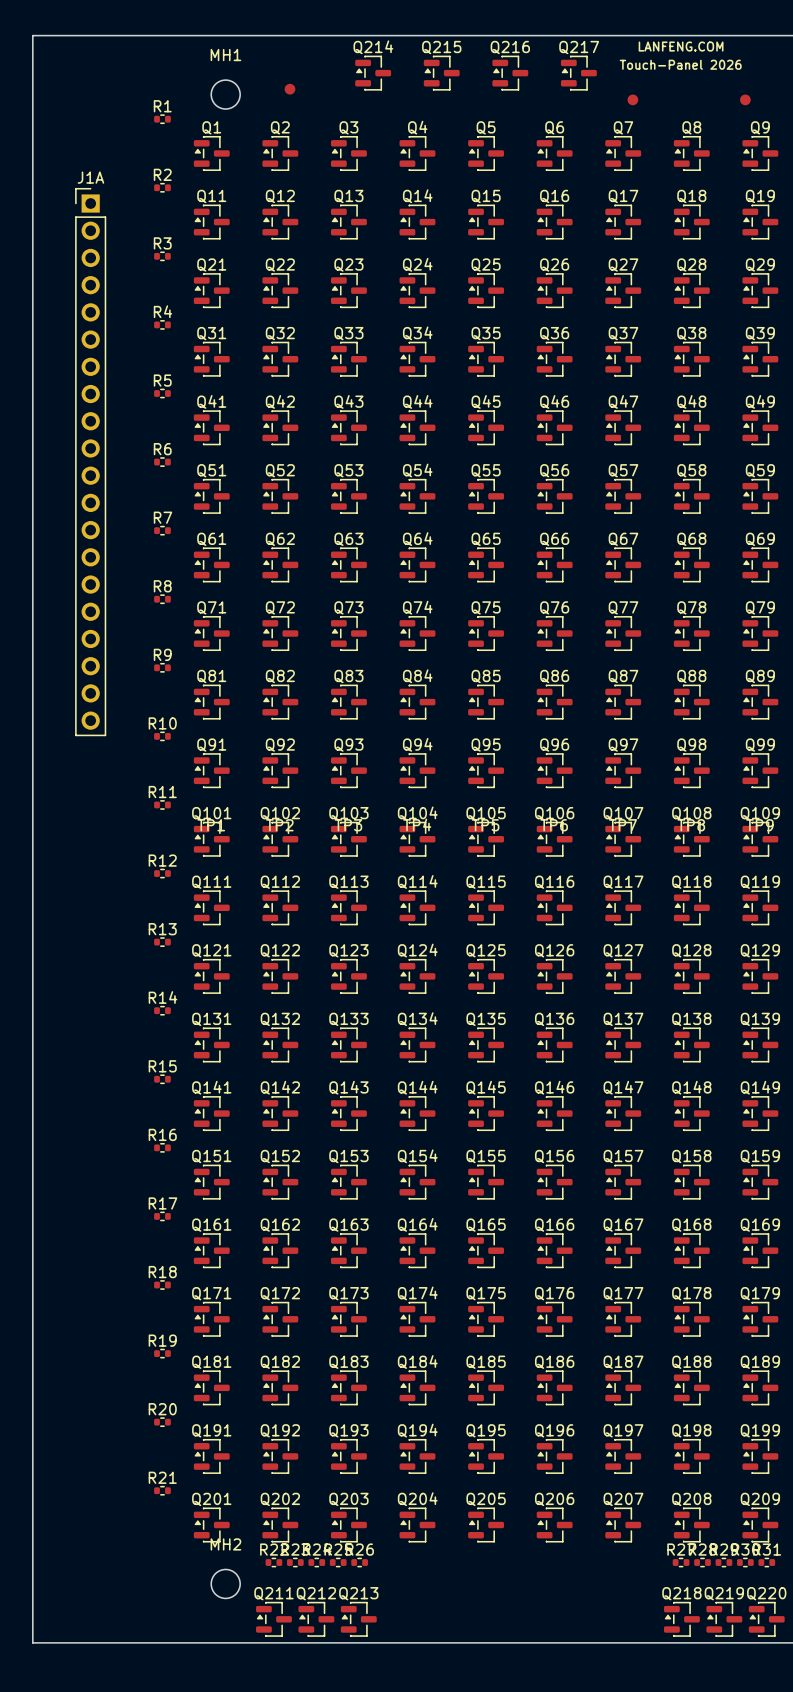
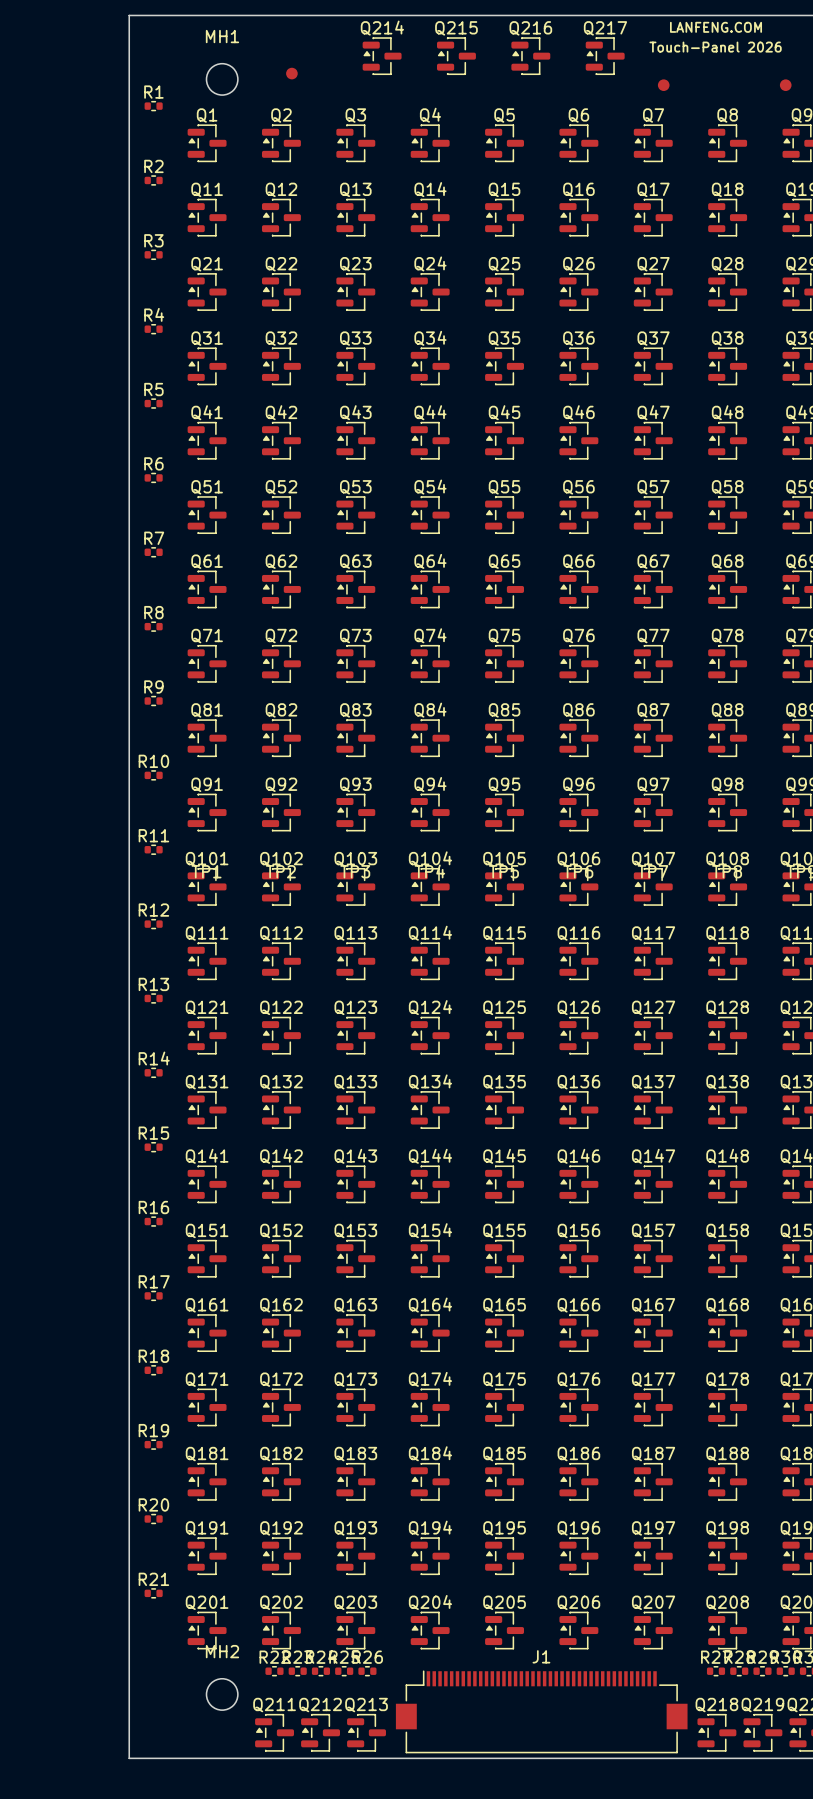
board edge: (139, 35) (32, 35) (32, 1642) (139, 1642) -> (129, 15) (129, 1758)
J1A: (90, 462) -> none
J1: none -> (541, 1711)

